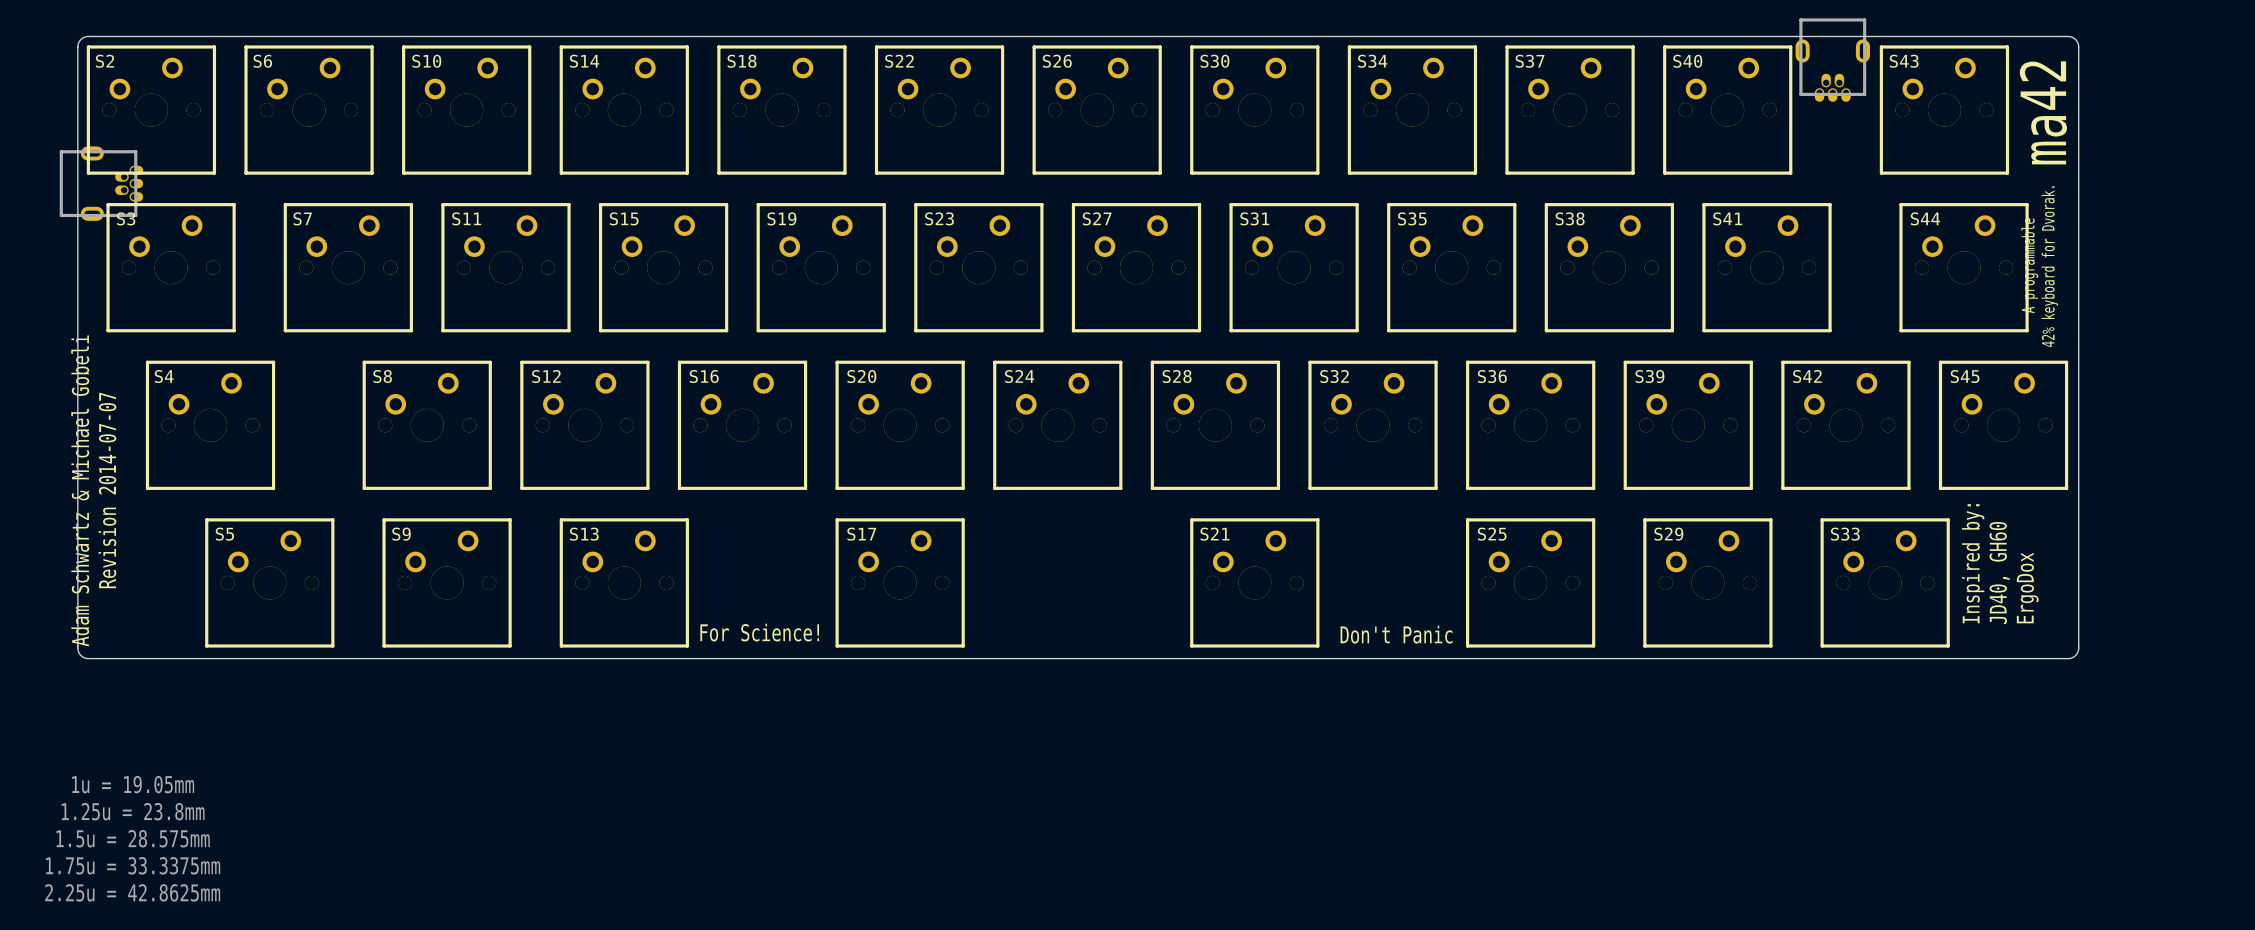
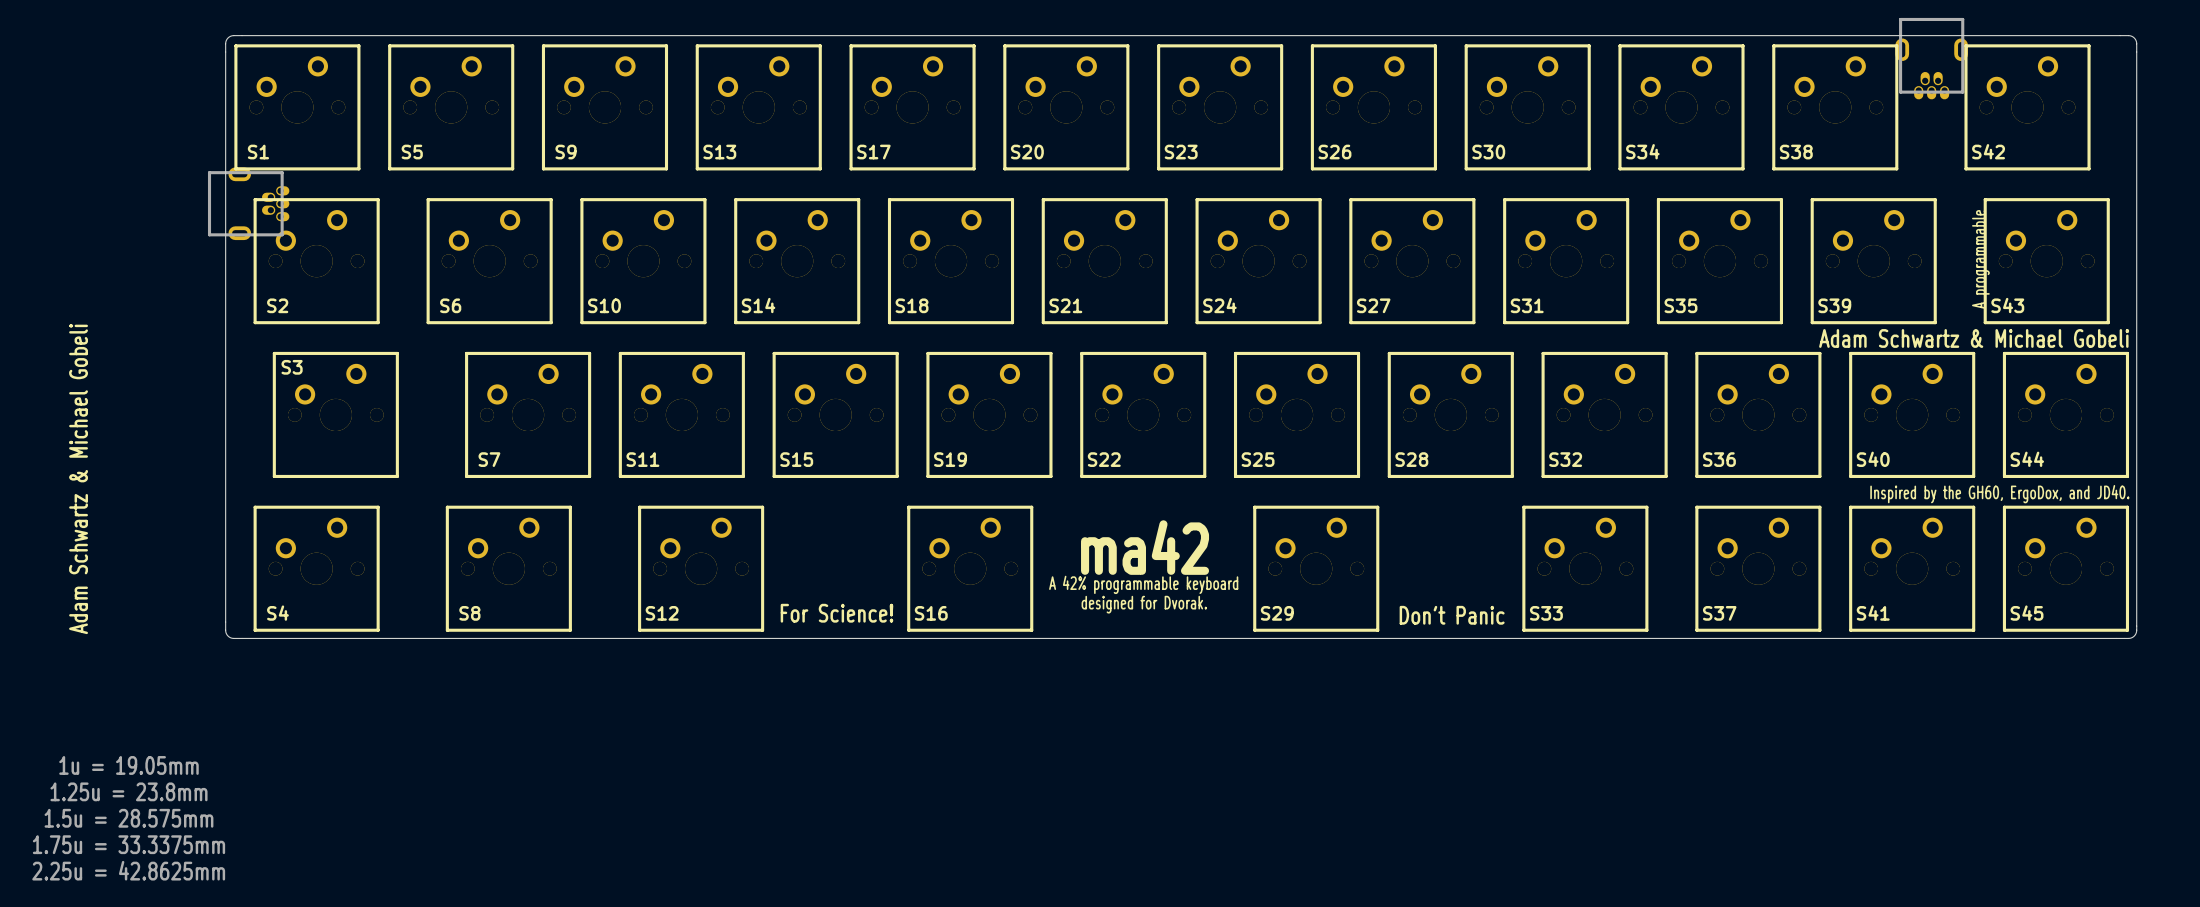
board edge: (239, 36) (88, 36) (81, 38) (78, 44) (77, 648) (80, 654) (85, 658) (2070, 658) (2076, 654) (2078, 648) (2078, 47) (2075, 39) (2068, 36) -> (233, 35) (228, 38) (225, 43) (225, 630) (227, 635) (231, 638) (2129, 638) (2134, 636) (2136, 630) (2136, 42) (2133, 37) (2128, 35) (2017, 35)
part position: (1832, 60) -> (1931, 58)
S2 name position: S2 (105, 61) -> S2 (277, 305)
S6 name position: S6 (262, 61) -> S6 (450, 305)
S10 name position: S10 (426, 61) -> S10 (604, 305)
S14 name position: S14 (584, 61) -> S14 (758, 305)
S18 name position: S18 (742, 61) -> S18 (912, 305)
S22 name position: S22 (899, 61) -> S22 (1104, 459)
S26 name position: S26 (1057, 61) -> S26 (1334, 152)
S30 name position: S30 (1214, 61) -> S30 (1488, 152)
S34 name position: S34 (1372, 61) -> S34 (1642, 151)
S37 name position: S37 (1530, 61) -> S37 (1719, 613)
S40 name position: S40 (1687, 61) -> S40 (1873, 459)
S43 name position: S43 (1904, 61) -> S43 (2007, 305)
S2 position: (151, 110) -> (316, 261)
S1: none -> (297, 107)
S6 position: (309, 110) -> (489, 261)
S10 position: (466, 110) -> (643, 261)
S14 position: (624, 110) -> (797, 261)
S18 position: (781, 110) -> (951, 261)
S22 position: (939, 110) -> (1143, 414)
S26 position: (1097, 110) -> (1373, 107)
S30 position: (1254, 110) -> (1527, 107)
S34 position: (1412, 110) -> (1681, 107)
S37 position: (1570, 110) -> (1758, 568)
S40 position: (1727, 110) -> (1912, 414)
S43 position: (1944, 110) -> (2046, 261)
text: ma42 (2043, 112) -> none
part position: (101, 183) -> (248, 203)
S7 name position: S7 (302, 218) -> S7 (489, 459)
S11 name position: S11 (466, 218) -> S11 (642, 459)
S15 name position: S15 (624, 218) -> S15 (796, 459)
S19 name position: S19 (781, 218) -> S19 (950, 459)
S23 name position: S23 (939, 218) -> S23 (1181, 152)
S27 name position: S27 (1097, 218) -> S27 (1373, 305)
S31 name position: S31 (1254, 218) -> S31 (1527, 305)
S35 name position: S35 (1412, 218) -> S35 (1680, 305)
S38 name position: S38 (1570, 218) -> S38 (1796, 152)
S41 name position: S41 (1727, 218) -> S41 (1873, 613)
S44 name position: S44 (1925, 218) -> S44 (2027, 459)
text: 42% keyboard for Dvorak. (2049, 266) -> none
S3 position: (171, 267) -> (335, 414)
S7 position: (348, 267) -> (528, 414)
S11 position: (505, 267) -> (681, 414)
S15 position: (663, 267) -> (835, 414)
S19 position: (821, 267) -> (989, 414)
S23 position: (978, 267) -> (1220, 107)
S27 position: (1136, 267) -> (1412, 261)
S31 position: (1294, 267) -> (1566, 261)
S35 position: (1451, 267) -> (1719, 261)
S38 position: (1609, 267) -> (1835, 107)
S41 position: (1767, 267) -> (1912, 568)
S44 position: (1964, 267) -> (2065, 414)
text: none -> Adam Schwartz & Michael Gobeli (1974, 338)
S4 name position: S4 (164, 376) -> S4 (277, 613)
S8 name position: S8 (382, 376) -> S8 (469, 613)
S12 name position: S12 (546, 376) -> S12 (662, 613)
S16 name position: S16 (704, 376) -> S16 (931, 613)
S20 name position: S20 (861, 376) -> S20 (1027, 152)
S24 name position: S24 (1019, 376) -> S24 (1219, 305)
S28 name position: S28 (1177, 376) -> S28 (1411, 459)
S32 name position: S32 (1334, 376) -> S32 (1565, 459)
S36 name position: S36 (1492, 376) -> S36 (1719, 459)
S39 name position: S39 (1649, 376) -> S39 (1834, 305)
S42 name position: S42 (1807, 376) -> S42 (1988, 151)
S45 name position: S45 (1965, 376) -> S45 (2027, 613)
S4 position: (210, 425) -> (316, 568)
S8 position: (427, 425) -> (508, 568)
S12 position: (584, 425) -> (701, 568)
S16 position: (742, 425) -> (970, 568)
S20 position: (900, 425) -> (1066, 107)
S24 position: (1057, 425) -> (1258, 261)
S28 position: (1215, 425) -> (1450, 414)
S32 position: (1373, 425) -> (1604, 414)
S36 position: (1530, 425) -> (1758, 414)
S39 position: (1688, 425) -> (1873, 261)
S42 position: (1845, 425) -> (2027, 107)
S45 position: (2003, 425) -> (2065, 568)
text: Revision 2014-07-07 (107, 490) -> none
text: none -> Inspired by the GH60, ErgoDox, and JD40. (1999, 494)
S5 name position: S5 (224, 534) -> S5 (412, 152)
S9 name position: S9 (401, 534) -> S9 (566, 152)
S13 name position: S13 (584, 534) -> S13 (719, 152)
S17 name position: S17 (861, 534) -> S17 (873, 152)
S21 name position: S21 (1214, 534) -> S21 (1065, 305)
S25 name position: S25 (1492, 534) -> S25 (1258, 459)
S29 name position: S29 (1668, 534) -> S29 (1277, 613)
S33 name position: S33 (1845, 534) -> S33 (1546, 613)
text: none -> ma42 (1145, 547)
text: Inspired by: (1973, 563) -> none
text: JD40, GH60 (1999, 573) -> none
S5 position: (269, 582) -> (451, 107)
S9 position: (447, 582) -> (604, 107)
S13 position: (624, 582) -> (758, 107)
S17 position: (900, 582) -> (912, 107)
S21 position: (1254, 582) -> (1104, 261)
S25 position: (1530, 582) -> (1297, 414)
S29 position: (1707, 582) -> (1316, 568)
S33 position: (1885, 582) -> (1585, 568)
text: ErgoDox (2027, 588) -> none
text: none -> A 42% programmable keyboard (1143, 584)
text: none -> designed for Dvorak. (1144, 604)
text position: For Science! (759, 632) -> For Science! (836, 613)
text position: Don't Panic (1396, 634) -> Don't Panic (1452, 615)

